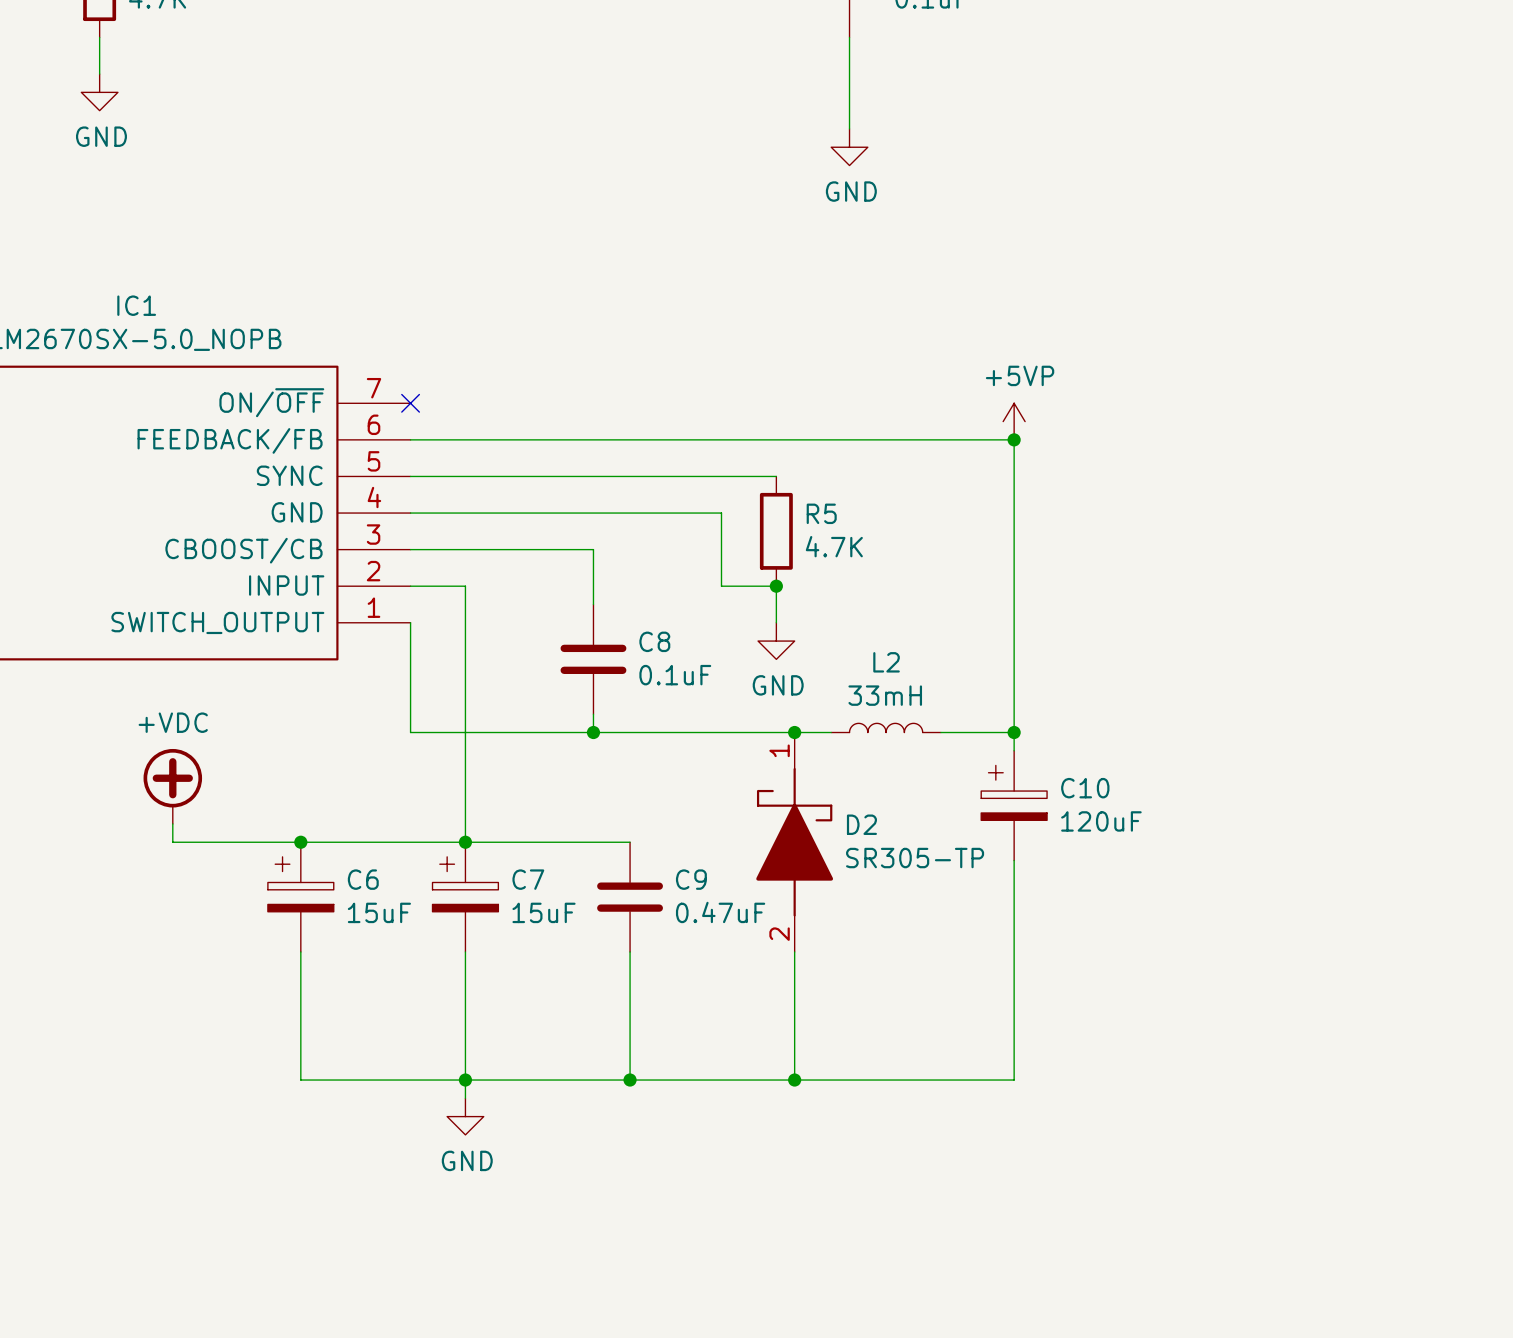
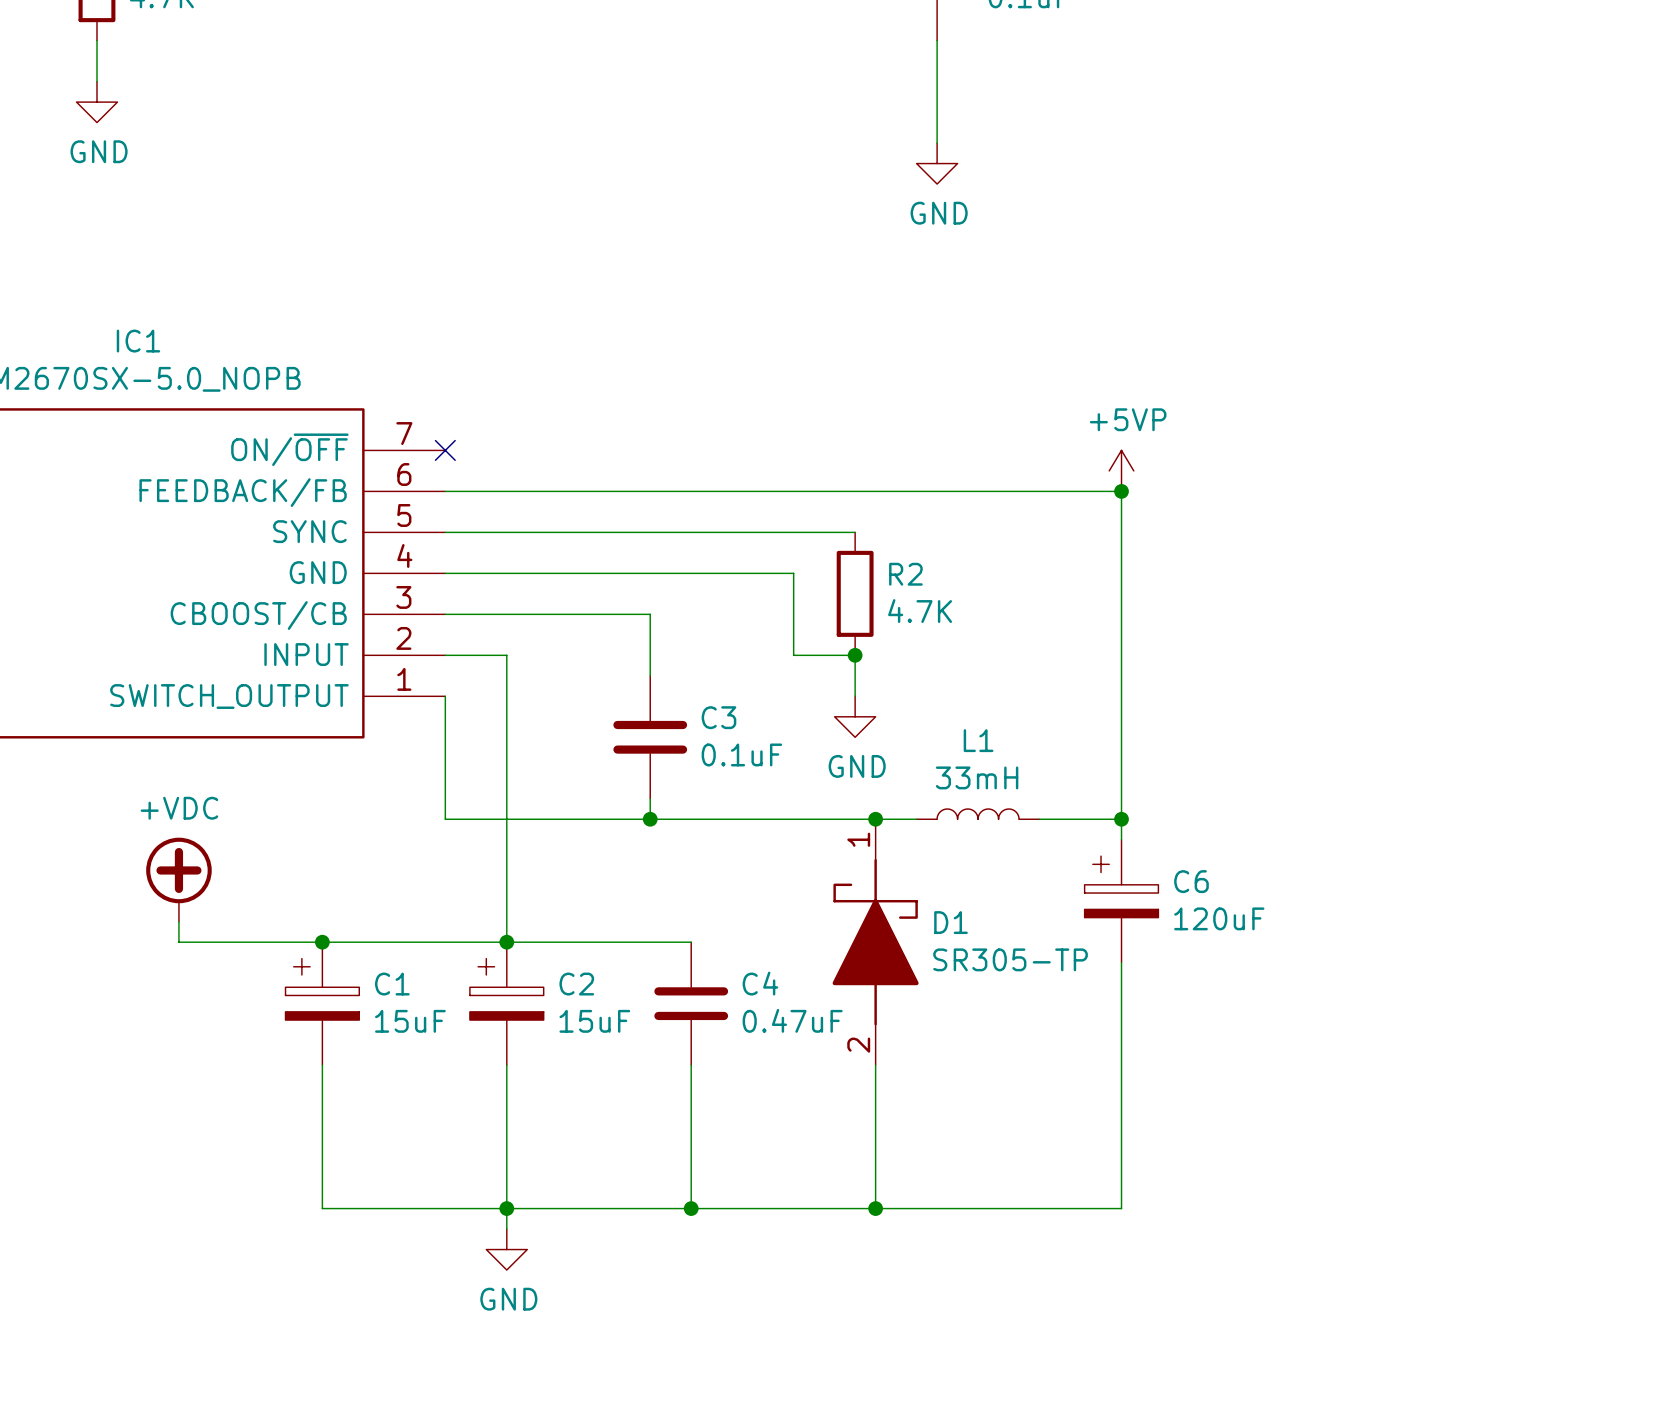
R5 name: R5 (821, 513) -> R2 (905, 574)
C8 name: C8 (654, 641) -> C3 (718, 717)
L2 name: L2 (886, 662) -> L1 (978, 740)
C10 name: C10 (1085, 788) -> C6 (1191, 881)
D2 name: D2 (861, 824) -> D1 (951, 922)
C6 name: C6 (363, 879) -> C1 (392, 984)
C7 name: C7 (528, 879) -> C2 (576, 984)
C9 name: C9 (691, 879) -> C4 (760, 983)

